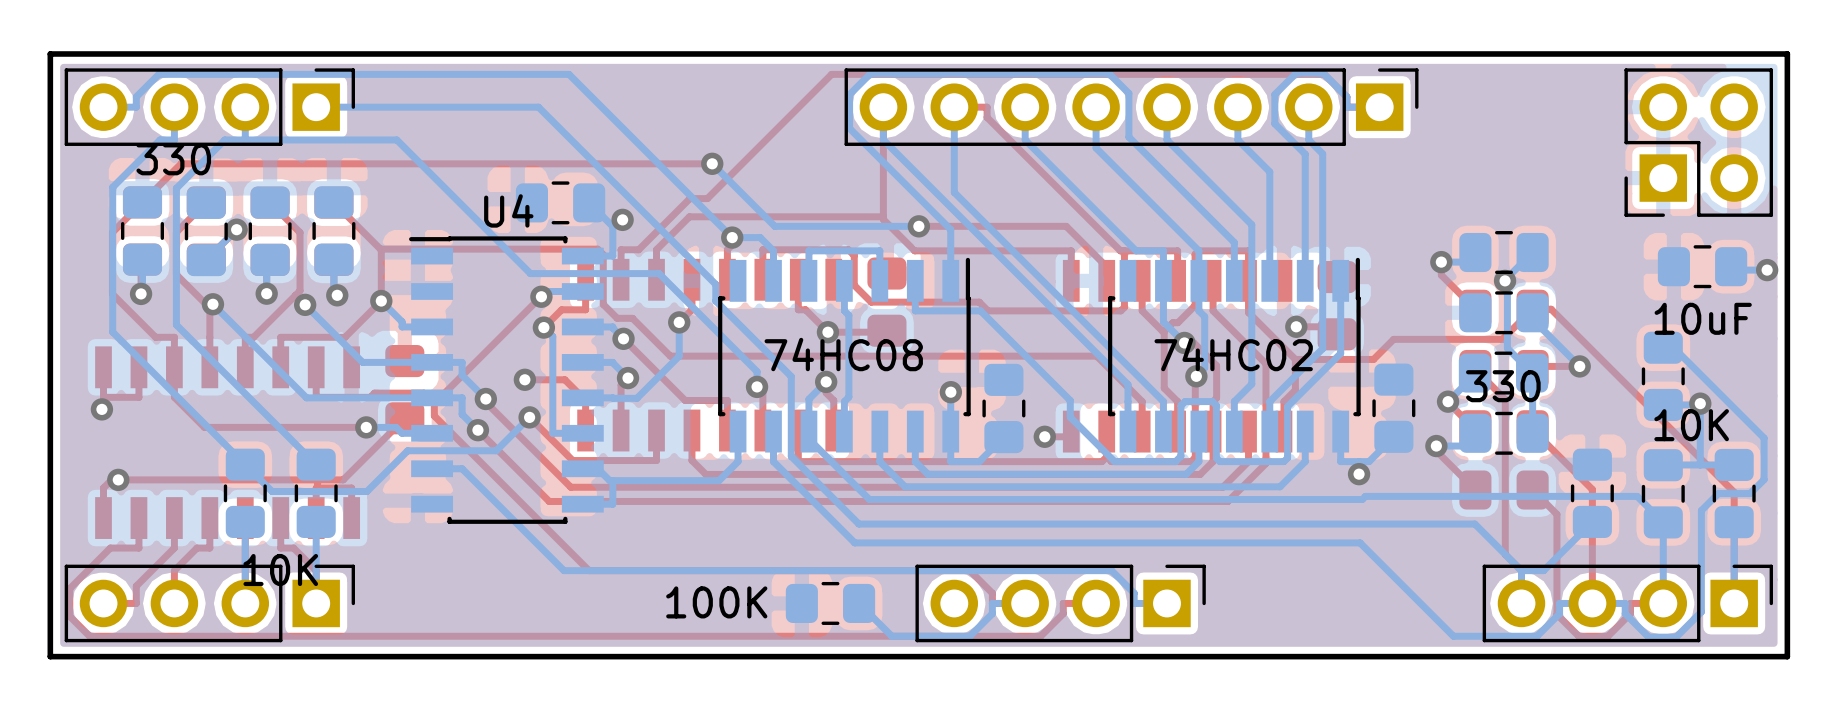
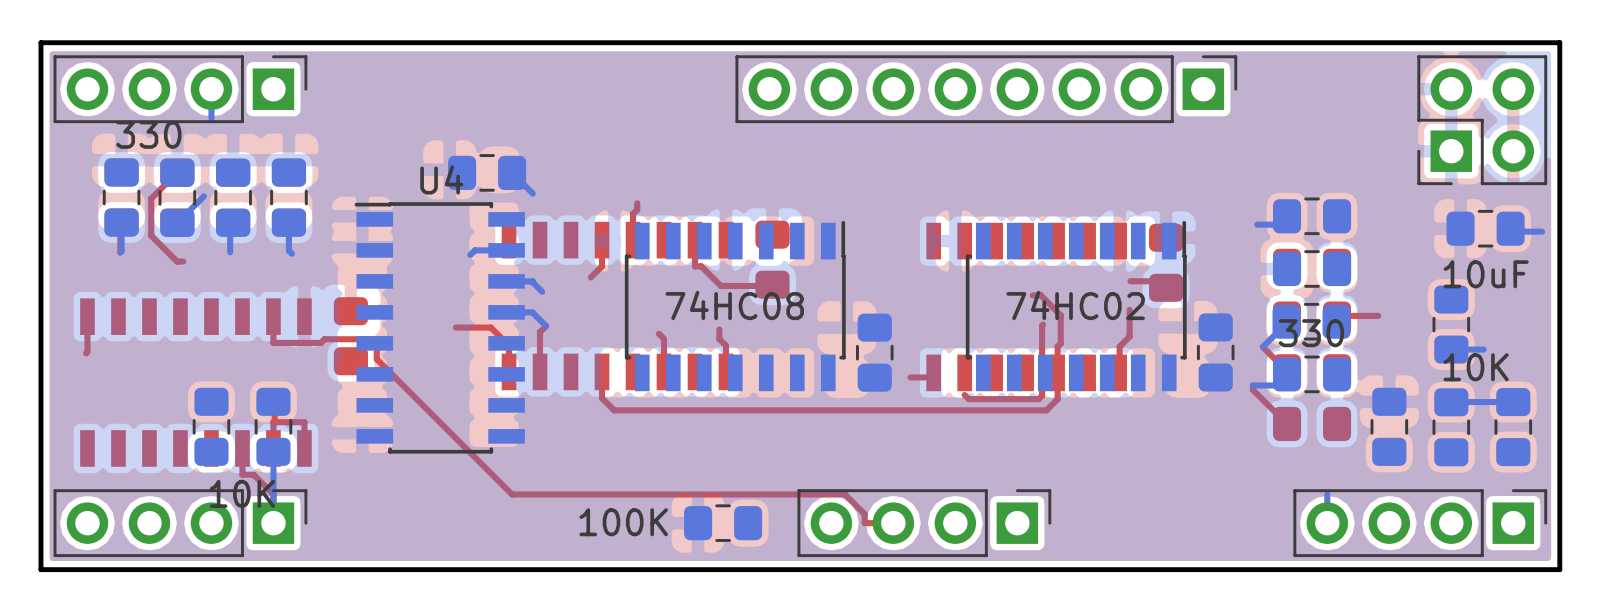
bottom track: (103, 107) (136, 107) (136, 96) (158, 74) (569, 74) (732, 237) (760, 237) (773, 250) (773, 280) -> none
bottom track: (174, 107) (174, 139) (160, 139) (112, 187) (112, 332) (272, 491) (366, 491) (407, 450) (496, 450) (529, 417) -> none
bottom track: (316, 107) (538, 107) (715, 284) (715, 301) (791, 376) (791, 456) (858, 524) (1474, 524) (1521, 570) (1543, 570) (1592, 521) -> none
top track: (883, 107) (883, 219) (914, 250) (1071, 250) (1071, 280) -> none
bottom track: (883, 107) (883, 139) (1127, 384) (1127, 431) -> none
top track: (954, 107) (987, 107) (987, 117) (1120, 250) (1177, 250) (1177, 280) -> none
bottom track: (954, 107) (954, 192) (1163, 401) (1163, 431) -> none
bottom track: (1025, 107) (1025, 139) (1136, 250) (1163, 250) (1163, 321) (1184, 342) -> none
bottom track: (1096, 107) (1096, 148) (1198, 250) (1198, 310) (1204, 316) (1204, 367) (1196, 376) -> none
bottom track: (1166, 107) (1166, 139) (1251, 224) (1251, 384) (1234, 401) (1234, 431) -> none
bottom track: (1237, 107) (1237, 139) (1269, 171) (1269, 280) -> none
bottom track: (1308, 107) (1308, 139) (1322, 153) (1322, 348) (1269, 401) (1269, 431) -> none
top track: (1379, 107) (1346, 107) (1346, 96) (1324, 74) (831, 74) (707, 198) (689, 198) (638, 249) (621, 249) (621, 279) -> none
bottom track: (1379, 107) (1346, 107) (1346, 96) (1323, 73) (1295, 73) (1274, 94) (1274, 123) (1305, 154) (1305, 280) -> none
top track: (712, 163) (181, 163) (112, 232) (112, 294) (155, 337) (174, 337) (174, 397) (204, 427) (366, 427) -> none
bottom track: (712, 163) (774, 226) (918, 226) -> none
via: (712, 163) -> none
top track: (270, 202) (300, 232) (300, 290) (295, 295) -> none
top track: (333, 202) (380, 249) (597, 249) (603, 254) (603, 304) (617, 318) (632, 318) (670, 356) (1096, 356) (1142, 401) (1142, 431) -> none
top track: (883, 216) (689, 216) (656, 249) (656, 279) -> none
bottom track: (622, 219) (619, 219) (612, 226) (612, 256) (582, 256) -> none
via: (622, 219) -> none
top track: (918, 226) (1066, 226) (1106, 266) (1106, 280) -> none
via: (918, 226) -> none
via: (236, 229) -> none
via: (732, 237) -> none
top track: (381, 249) (381, 301) (345, 337) (280, 337) (280, 367) -> none
top track: (1124, 250) (1124, 307) (1120, 310) (988, 310) (979, 302) (871, 302) (854, 285) (854, 255) (848, 249) (762, 249) (762, 279) -> none
bottom track: (1532, 252) (1507, 277) (1507, 348) (1532, 373) (1532, 433) -> none
top track: (1441, 262) (1441, 275) (1475, 309) -> none
via: (1441, 262) -> none
via: (1767, 270) -> none
top track: (585, 279) (585, 309) (561, 309) (543, 327) -> none
bottom track: (844, 280) (844, 310) (848, 315) (848, 397) (844, 401) (844, 431) -> none
bottom track: (879, 280) (879, 250) (808, 250) (808, 280) -> none
top track: (1142, 280) (1142, 310) (1164, 331) -> none
top track: (1213, 280) (1213, 310) (1265, 363) (1265, 463) (1227, 501) (549, 501) (477, 430) -> none
bottom track: (1234, 280) (1234, 242) (1128, 137) (1128, 93) (1109, 73) (870, 73) (849, 94) (849, 128) (950, 229) (950, 280) -> none
bottom track: (1340, 280) (1340, 353) (1287, 406) (1287, 457) (1283, 461) (1219, 461) (1216, 458) (1216, 405) (1212, 401) (1185, 401) (1180, 405) (1180, 456) (1175, 461) (1114, 461) (1070, 417) (1070, 400) (980, 310) (915, 310) (915, 280) -> none
via: (1505, 280) -> none
via: (141, 293) -> none
via: (266, 293) -> none
top track: (295, 295) (253, 337) (245, 337) (245, 367) -> none
via: (337, 295) -> none
top track: (541, 296) (434, 403) -> none
via: (541, 296) -> none
bottom track: (381, 301) (402, 321) (402, 326) (432, 326) -> none
via: (381, 301) -> none
top track: (209, 304) (209, 367) -> none
bottom track: (212, 304) (306, 397) (462, 397) (462, 414) (477, 430) -> none
via: (212, 304) -> none
bottom track: (305, 304) (362, 362) (462, 362) (462, 375) (485, 398) -> none
via: (305, 304) -> none
bottom track: (1532, 312) (1532, 319) (1579, 366) -> none
bottom track: (679, 322) (679, 356) (636, 398) (582, 397) -> none
via: (679, 322) -> none
via: (1296, 326) -> none
bottom track: (543, 327) (552, 336) (552, 433) (582, 433) -> none
via: (543, 327) -> none
top track: (1164, 331) (1172, 322) (1177, 322) (1195, 305) (1195, 254) (1198, 250) (1248, 250) (1248, 312) (1295, 359) (1373, 359) (1393, 339) (1502, 339) (1532, 309) (1551, 309) (1734, 492) (1734, 603) -> none
top track: (1164, 331) (1164, 388) (1177, 401) (1177, 431) -> none
via: (827, 332) -> none
top track: (623, 338) (685, 400) (727, 400) (727, 430) -> none
via: (623, 338) -> none
via: (1184, 342) -> none
bottom track: (1663, 347) (1673, 347) (1764, 438) (1764, 479) (1750, 493) (1718, 493) (1701, 510) (1701, 611) (1676, 637) (1648, 637) (1625, 613) (1625, 603) (1559, 603) (1559, 613) (1537, 636) (1453, 636) (1360, 542) (854, 542) (773, 461) (773, 431) -> none
via: (1579, 366) -> none
top track: (138, 367) (138, 397) (103, 397) -> none
top track: (1475, 369) (1505, 399) (1505, 554) (1521, 570) (1521, 603) -> none
via: (1196, 376) -> none
via: (628, 378) -> none
via: (524, 379) -> none
bottom track: (826, 381) (808, 399) (808, 439) (869, 499) (1362, 499) (1365, 496) (1637, 496) (1663, 522) (1663, 603) -> none
via: (826, 381) -> none
bottom track: (757, 386) (757, 371) (659, 273) (530, 273) (396, 139) (224, 139) (176, 188) (176, 324) (316, 464) -> none
via: (757, 386) -> none
bottom track: (950, 392) (950, 461) (979, 461) (1003, 437) -> none
via: (950, 392) -> none
top track: (485, 398) (485, 402) (570, 487) (1222, 487) (1248, 461) (1248, 431) -> none
via: (485, 398) -> none
via: (1448, 401) -> none
bottom track: (1700, 403) (1700, 464) -> none
via: (1700, 403) -> none
via: (101, 409) -> none
top track: (529, 417) (572, 460) (656, 460) (656, 430) -> none
via: (529, 417) -> none
top track: (404, 418) (343, 479) (111, 479) (103, 488) (103, 518) -> none
bottom track: (366, 427) (396, 427) (402, 433) (432, 433) -> none
via: (366, 427) -> none
top track: (1532, 429) (1592, 489) (1592, 603) -> none
via: (477, 430) -> none
top track: (798, 430) (799, 461) (1102, 461) (1106, 456) (1106, 431) -> none
bottom track: (738, 431) (738, 461) (719, 480) (609, 480) (597, 468) (582, 468) -> none
bottom track: (1198, 431) (1198, 461) (1186, 474) (927, 474) (915, 461) (915, 431) -> none
bottom track: (1305, 431) (1305, 461) (1280, 486) (905, 486) (879, 461) (879, 431) -> none
bottom track: (1340, 431) (1340, 461) (1369, 461) (1393, 436) -> none
via: (1044, 436) -> none
via: (1436, 446) -> none
bottom track: (432, 468) (462, 468) (564, 570) (1111, 570) (1134, 593) (1134, 603) (1166, 603) -> none
via: (1359, 474) -> none
via: (118, 479) -> none
bottom track: (612, 480) (612, 504) (582, 504) -> none
top track: (1532, 490) (1556, 514) (1556, 614) (1578, 636) (1607, 636) (1630, 613) (1630, 603) (1663, 603) -> none
top track: (138, 518) (138, 548) (110, 548) (69, 588) (69, 616) (89, 636) (1040, 636) (1063, 613) (1063, 603) (1096, 603) -> none
top track: (174, 518) (174, 548) (136, 586) (136, 603) (103, 603) -> none
top track: (209, 518) (209, 548) (196, 548) (174, 570) (174, 603) -> none
bottom track: (245, 521) (245, 603) -> none
bottom track: (1734, 522) (1734, 603) -> none
bottom track: (1025, 603) (992, 603) (992, 613) (969, 636) (891, 636) (859, 603) -> none

